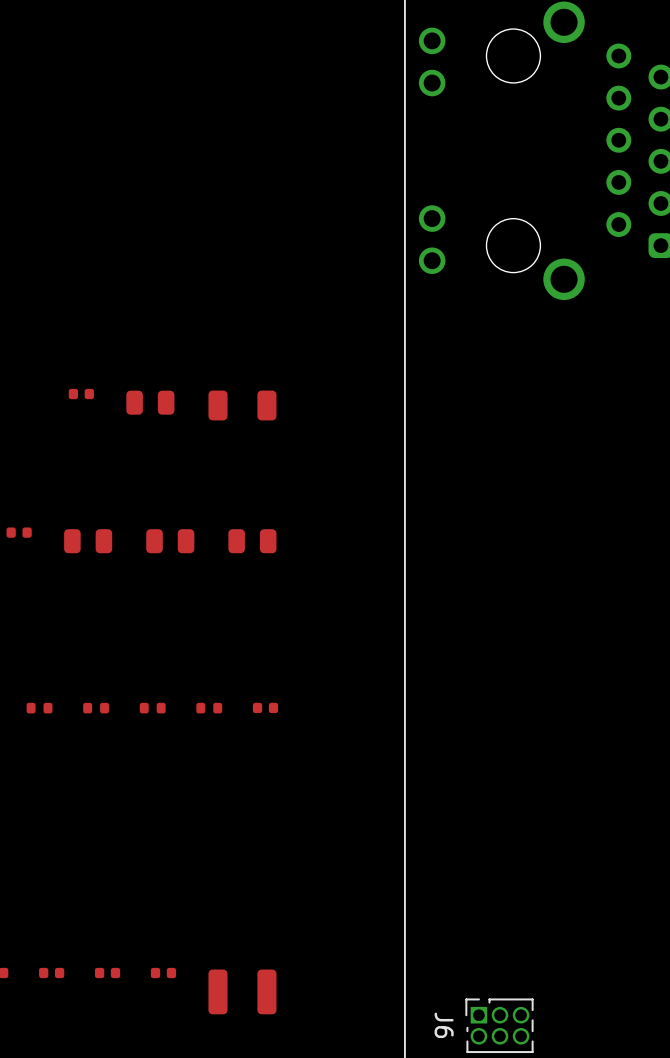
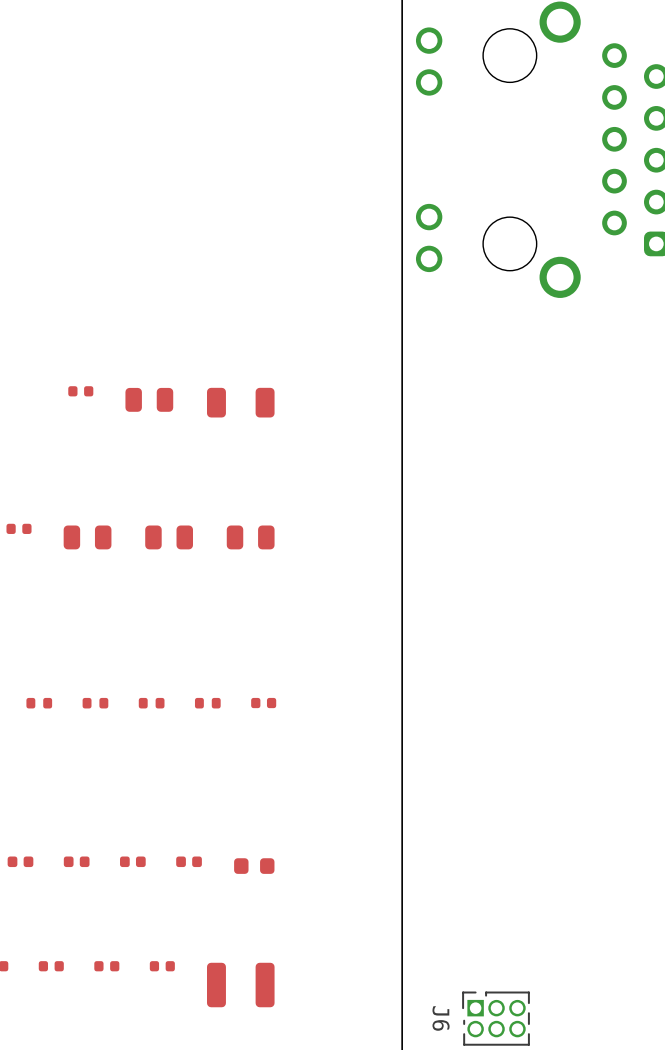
part: none -> (20, 861)
part: none -> (76, 861)
part: none -> (132, 861)
part: none -> (189, 861)
part: none -> (254, 866)

